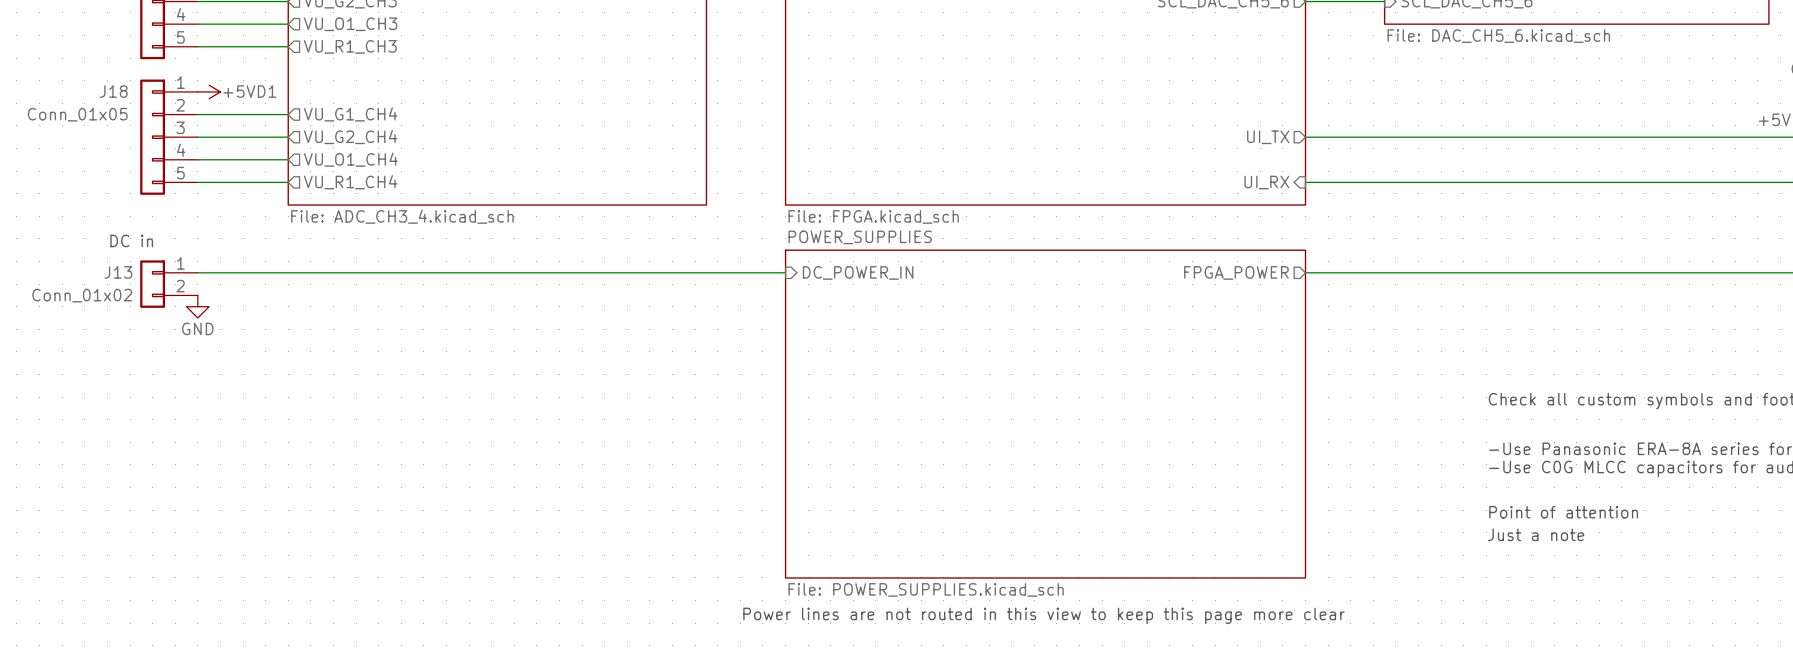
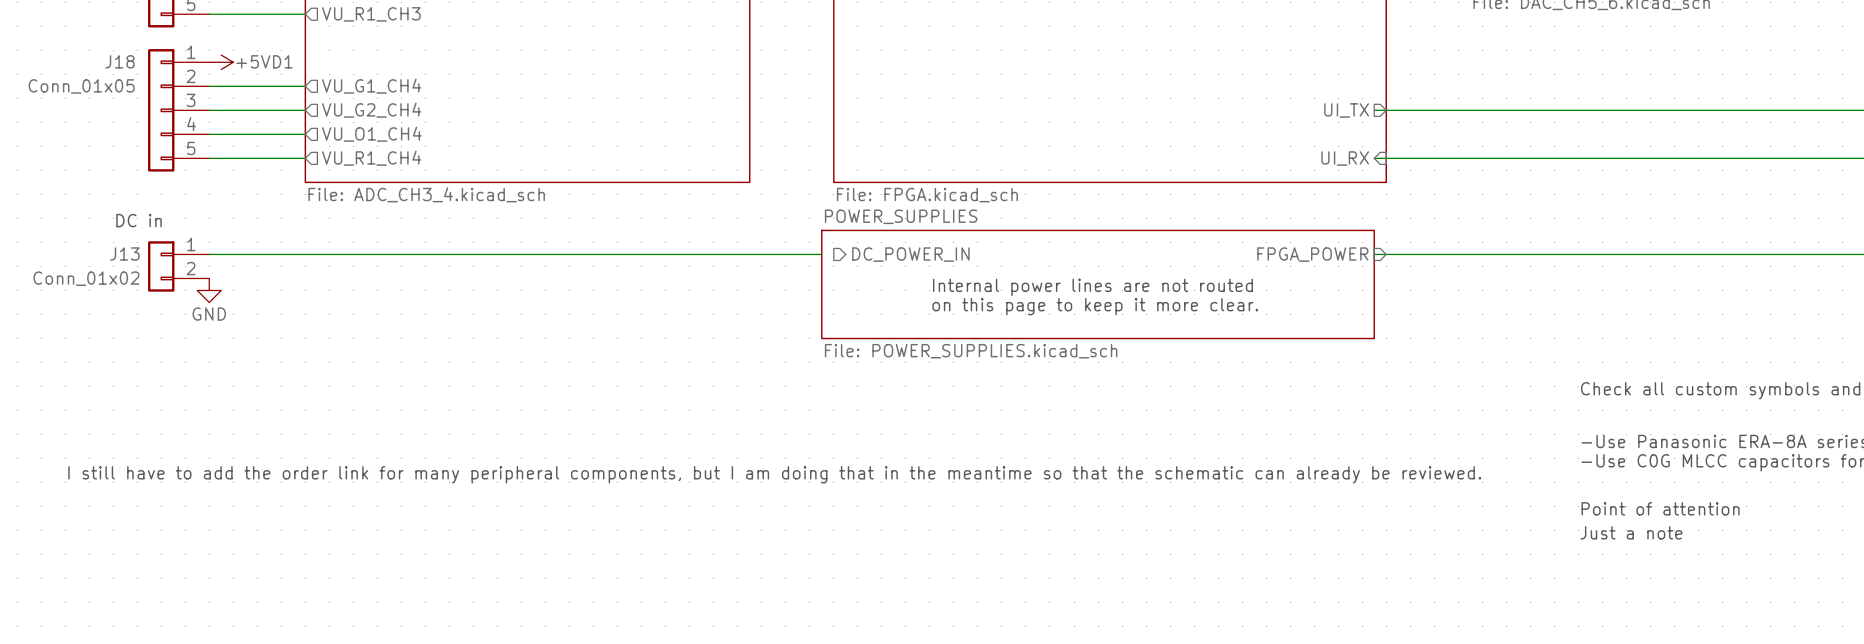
wire: none -> (1374, 110) (1386, 110)
wire: none -> (1374, 158) (1386, 158)
wire: (774, 272) (785, 272) -> none
wire: none -> (1374, 254) (1386, 254)
sheet POWER_SUPPLIES: none -> File: POWER_SUPPLIES.kicad_sch (1098, 284)
text: none -> Internal power lines are not routed (1092, 287)
text: none -> on this page to keep it more clear. (1095, 306)
sheet POWER_SUPPLIES: File: POWER_SUPPLIES.kicad_sch (1045, 414) -> none
text: none -> I still have to add the order link for many peripheral components, but I am doing that in the meantime so that the schematic can already be reviewed. (774, 474)
text: Power lines are not routed in this view to keep this page more clear (1044, 615) -> none

